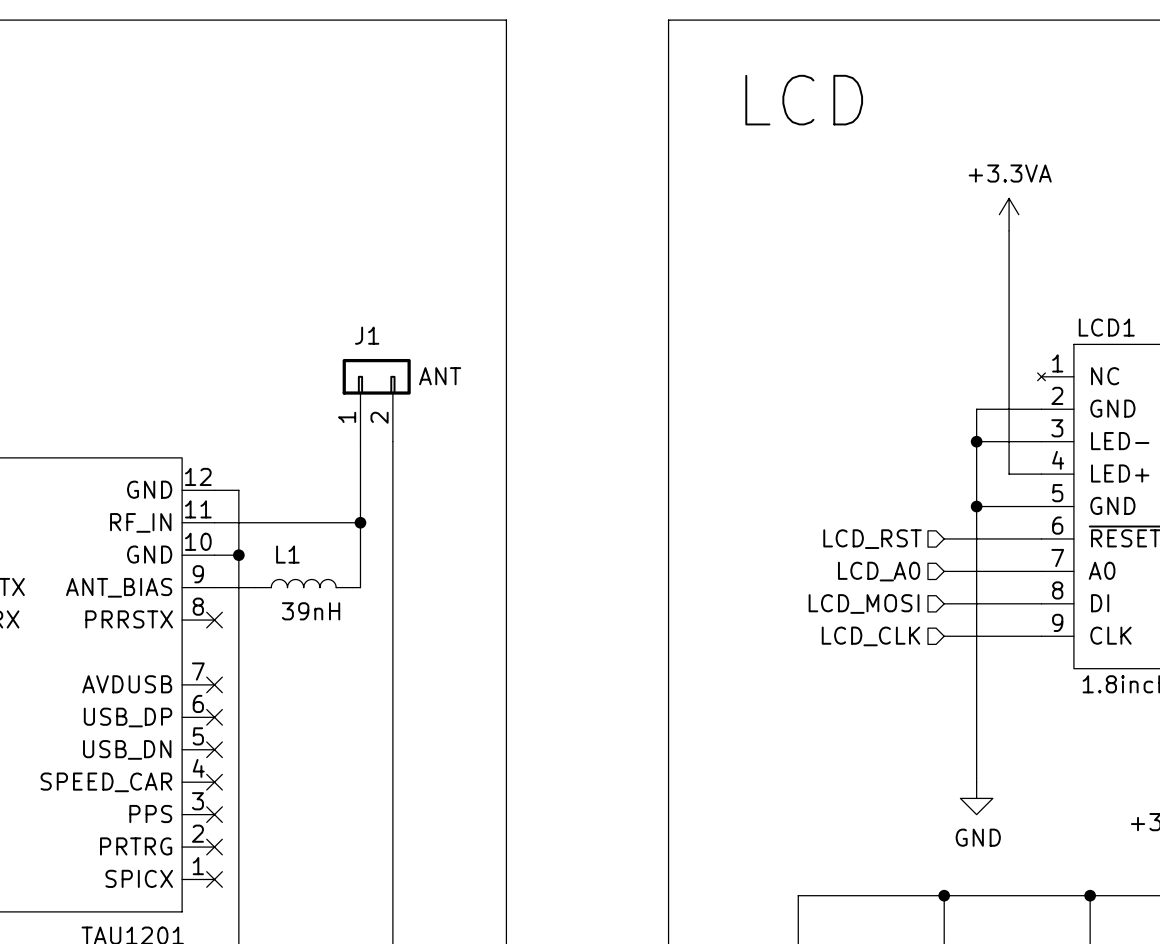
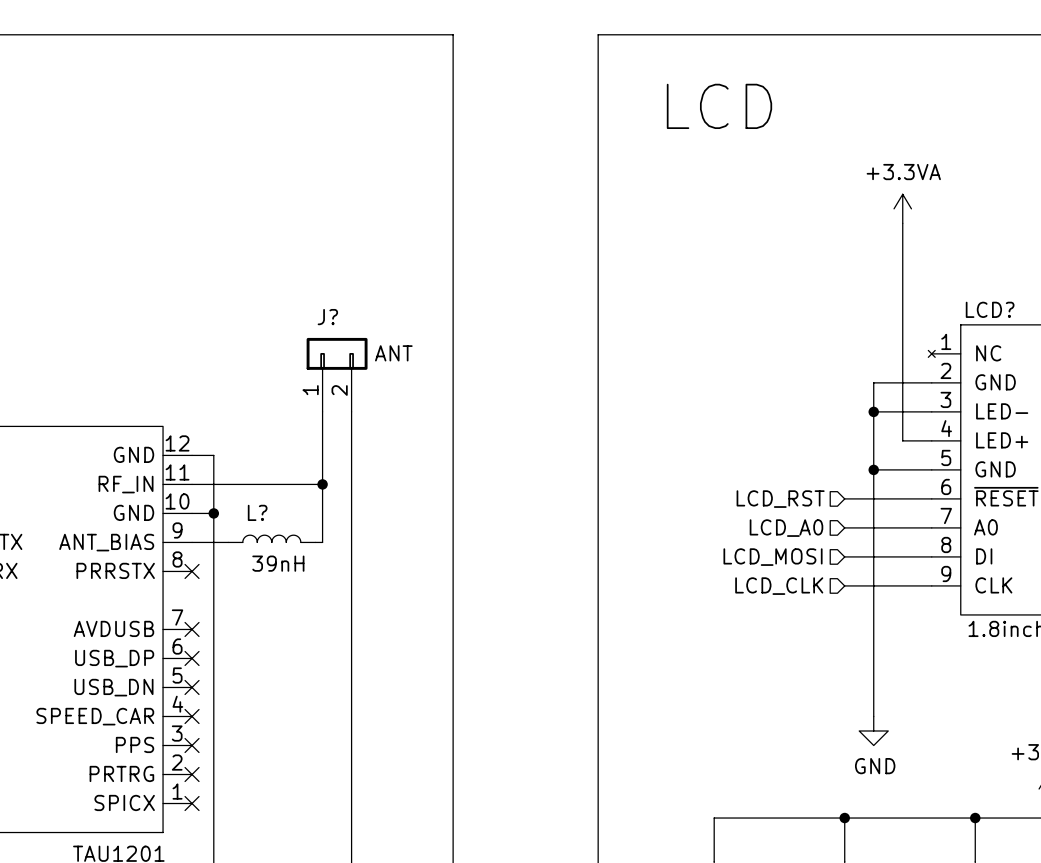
LCD1 name: LCD1 (1106, 327) -> LCD? (990, 309)
J1 name: J1 (367, 335) -> J? (327, 317)
L1 name: L1 (287, 554) -> L? (257, 512)

